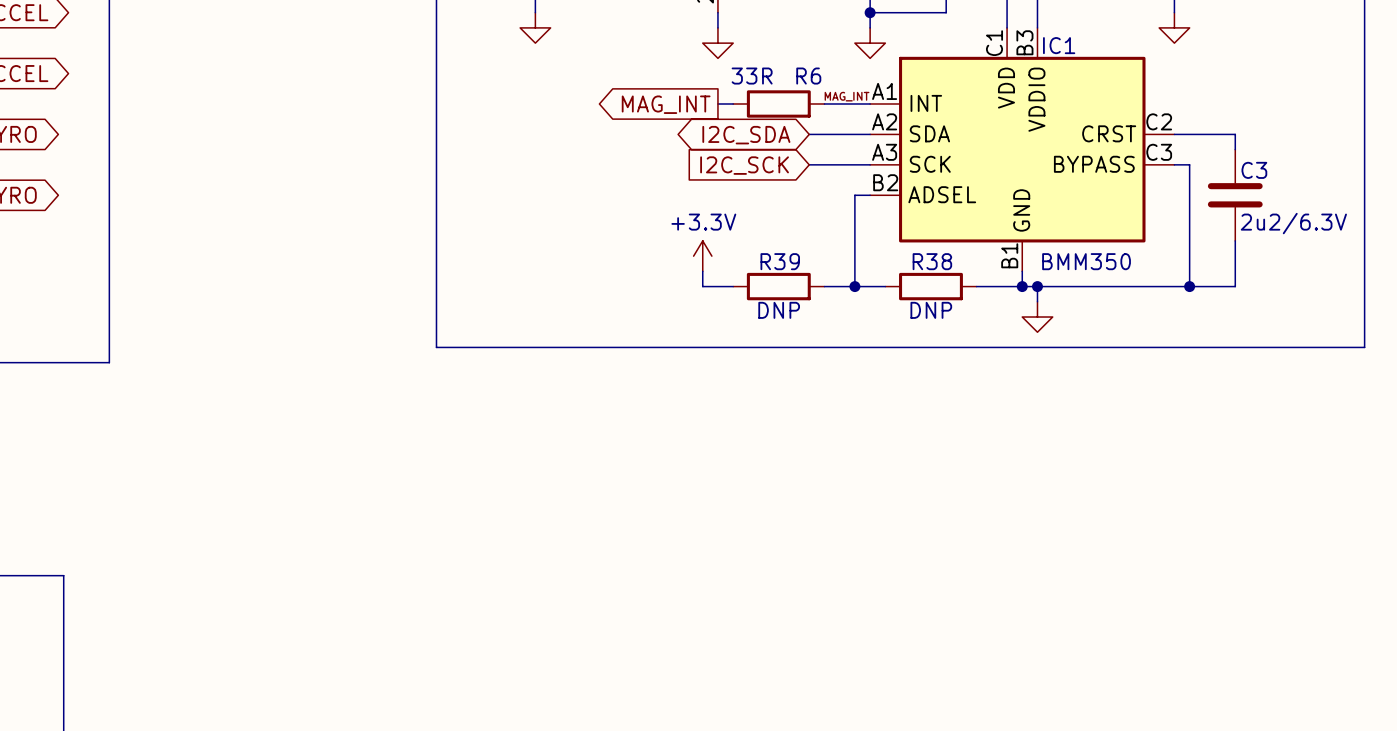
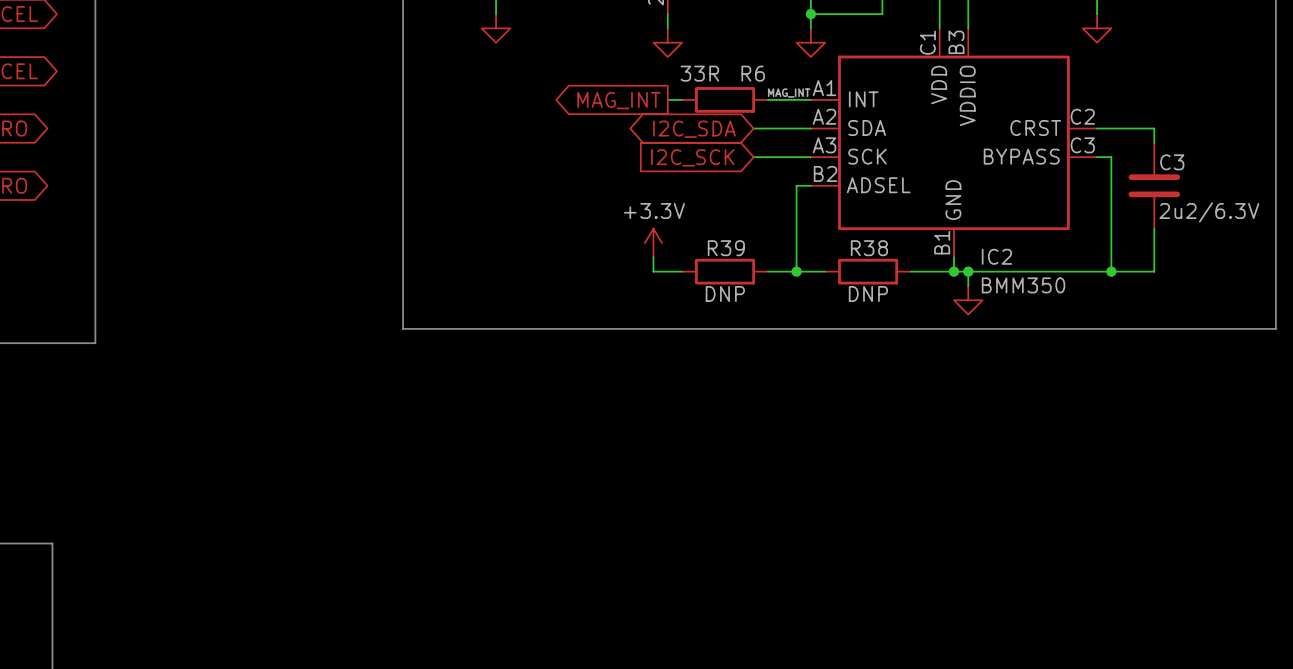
IC1 name: IC1 (1059, 45) -> IC2 (996, 256)
IC1 value position: BMM350 (1086, 261) -> BMM350 (1023, 285)

